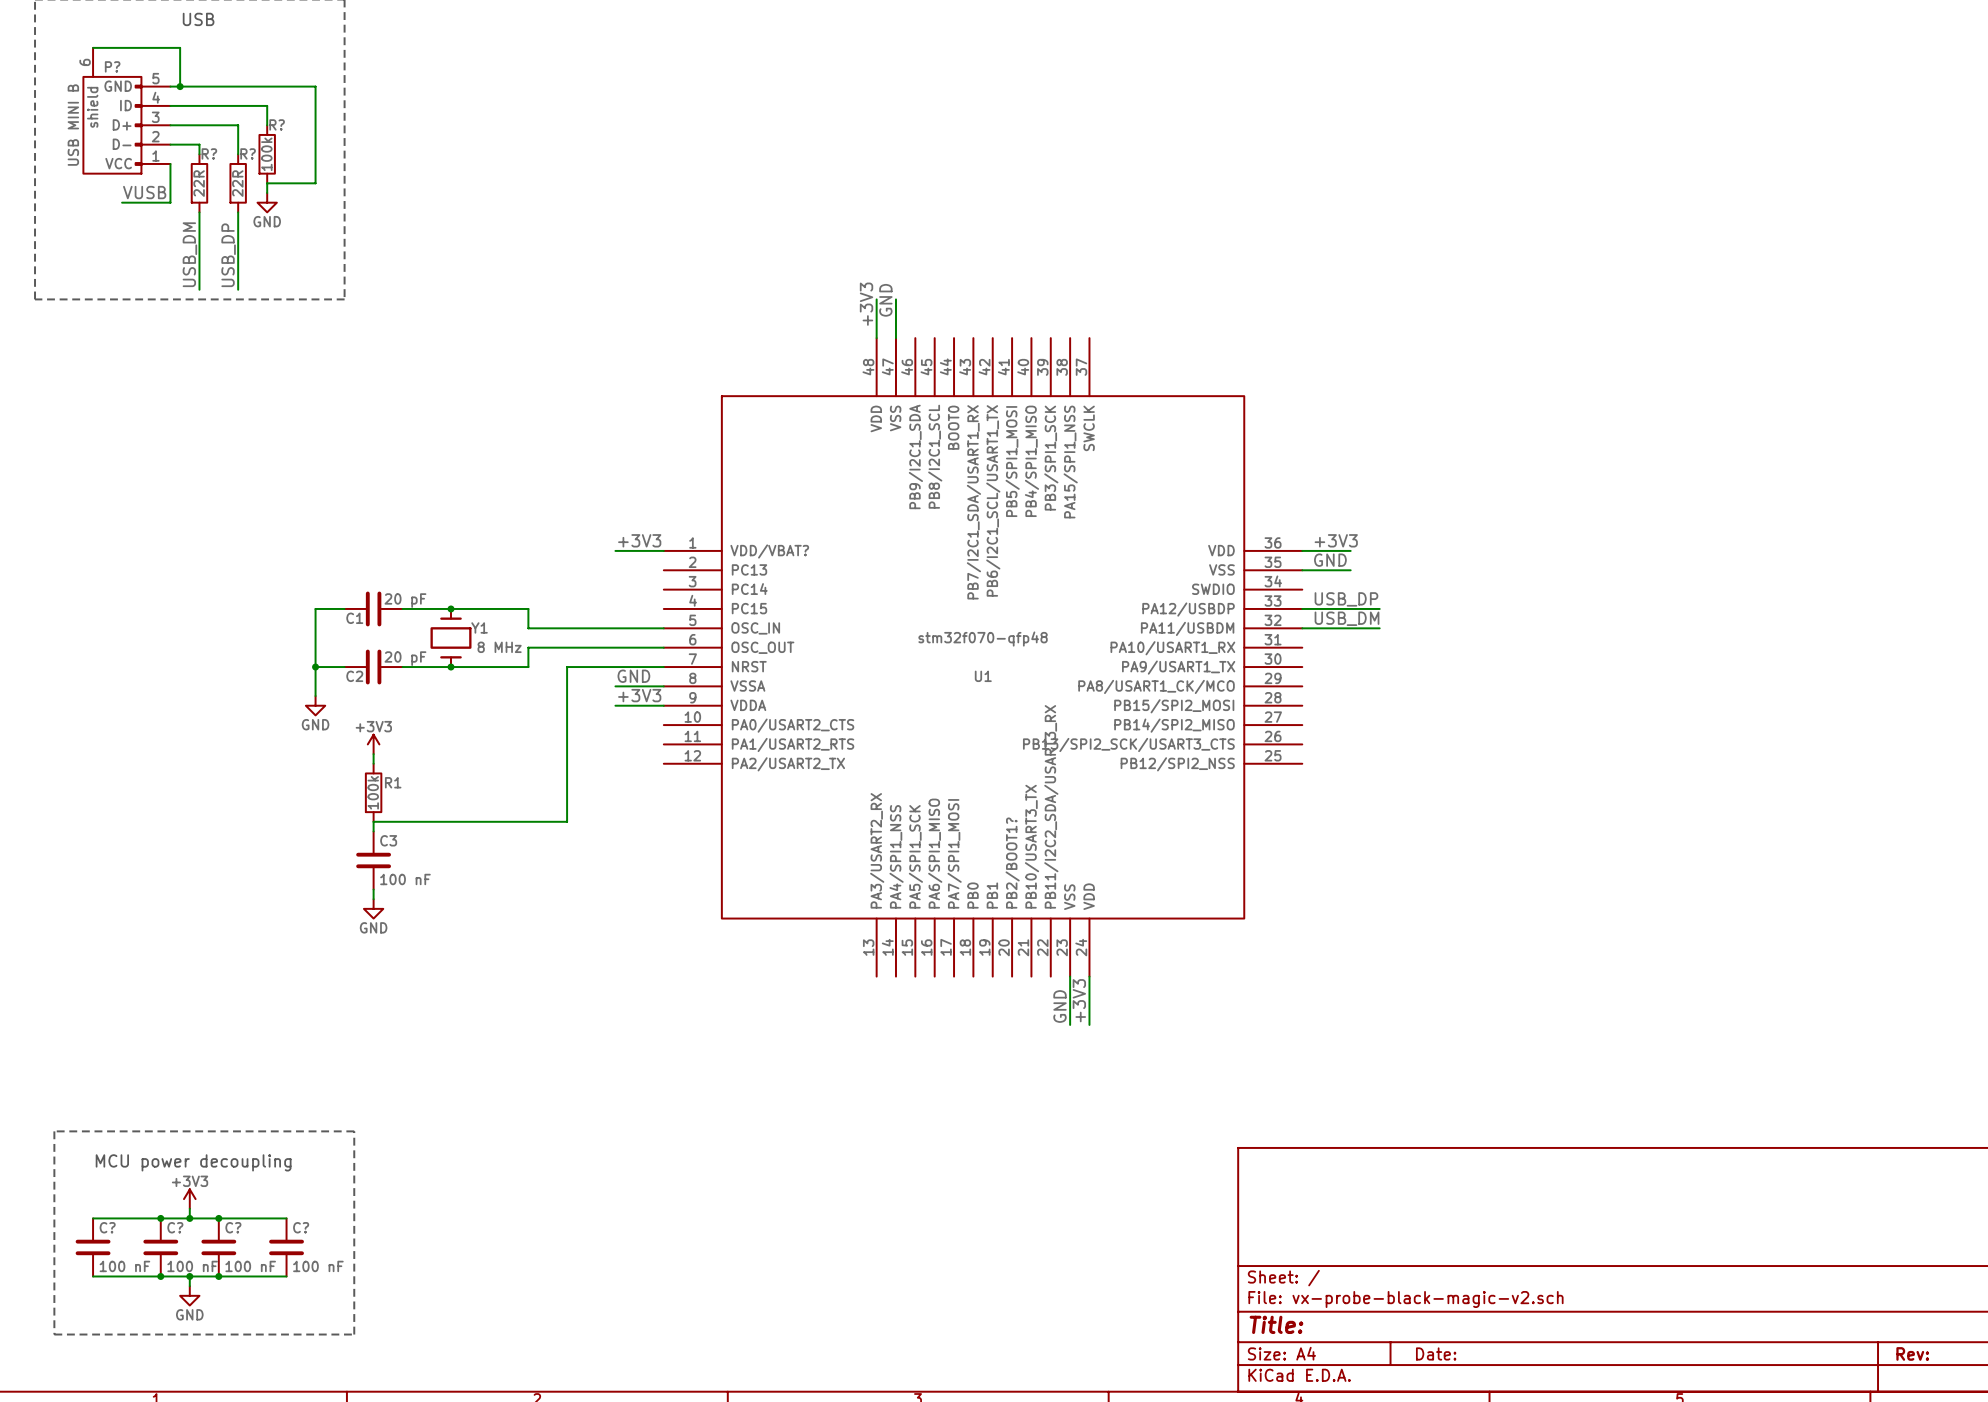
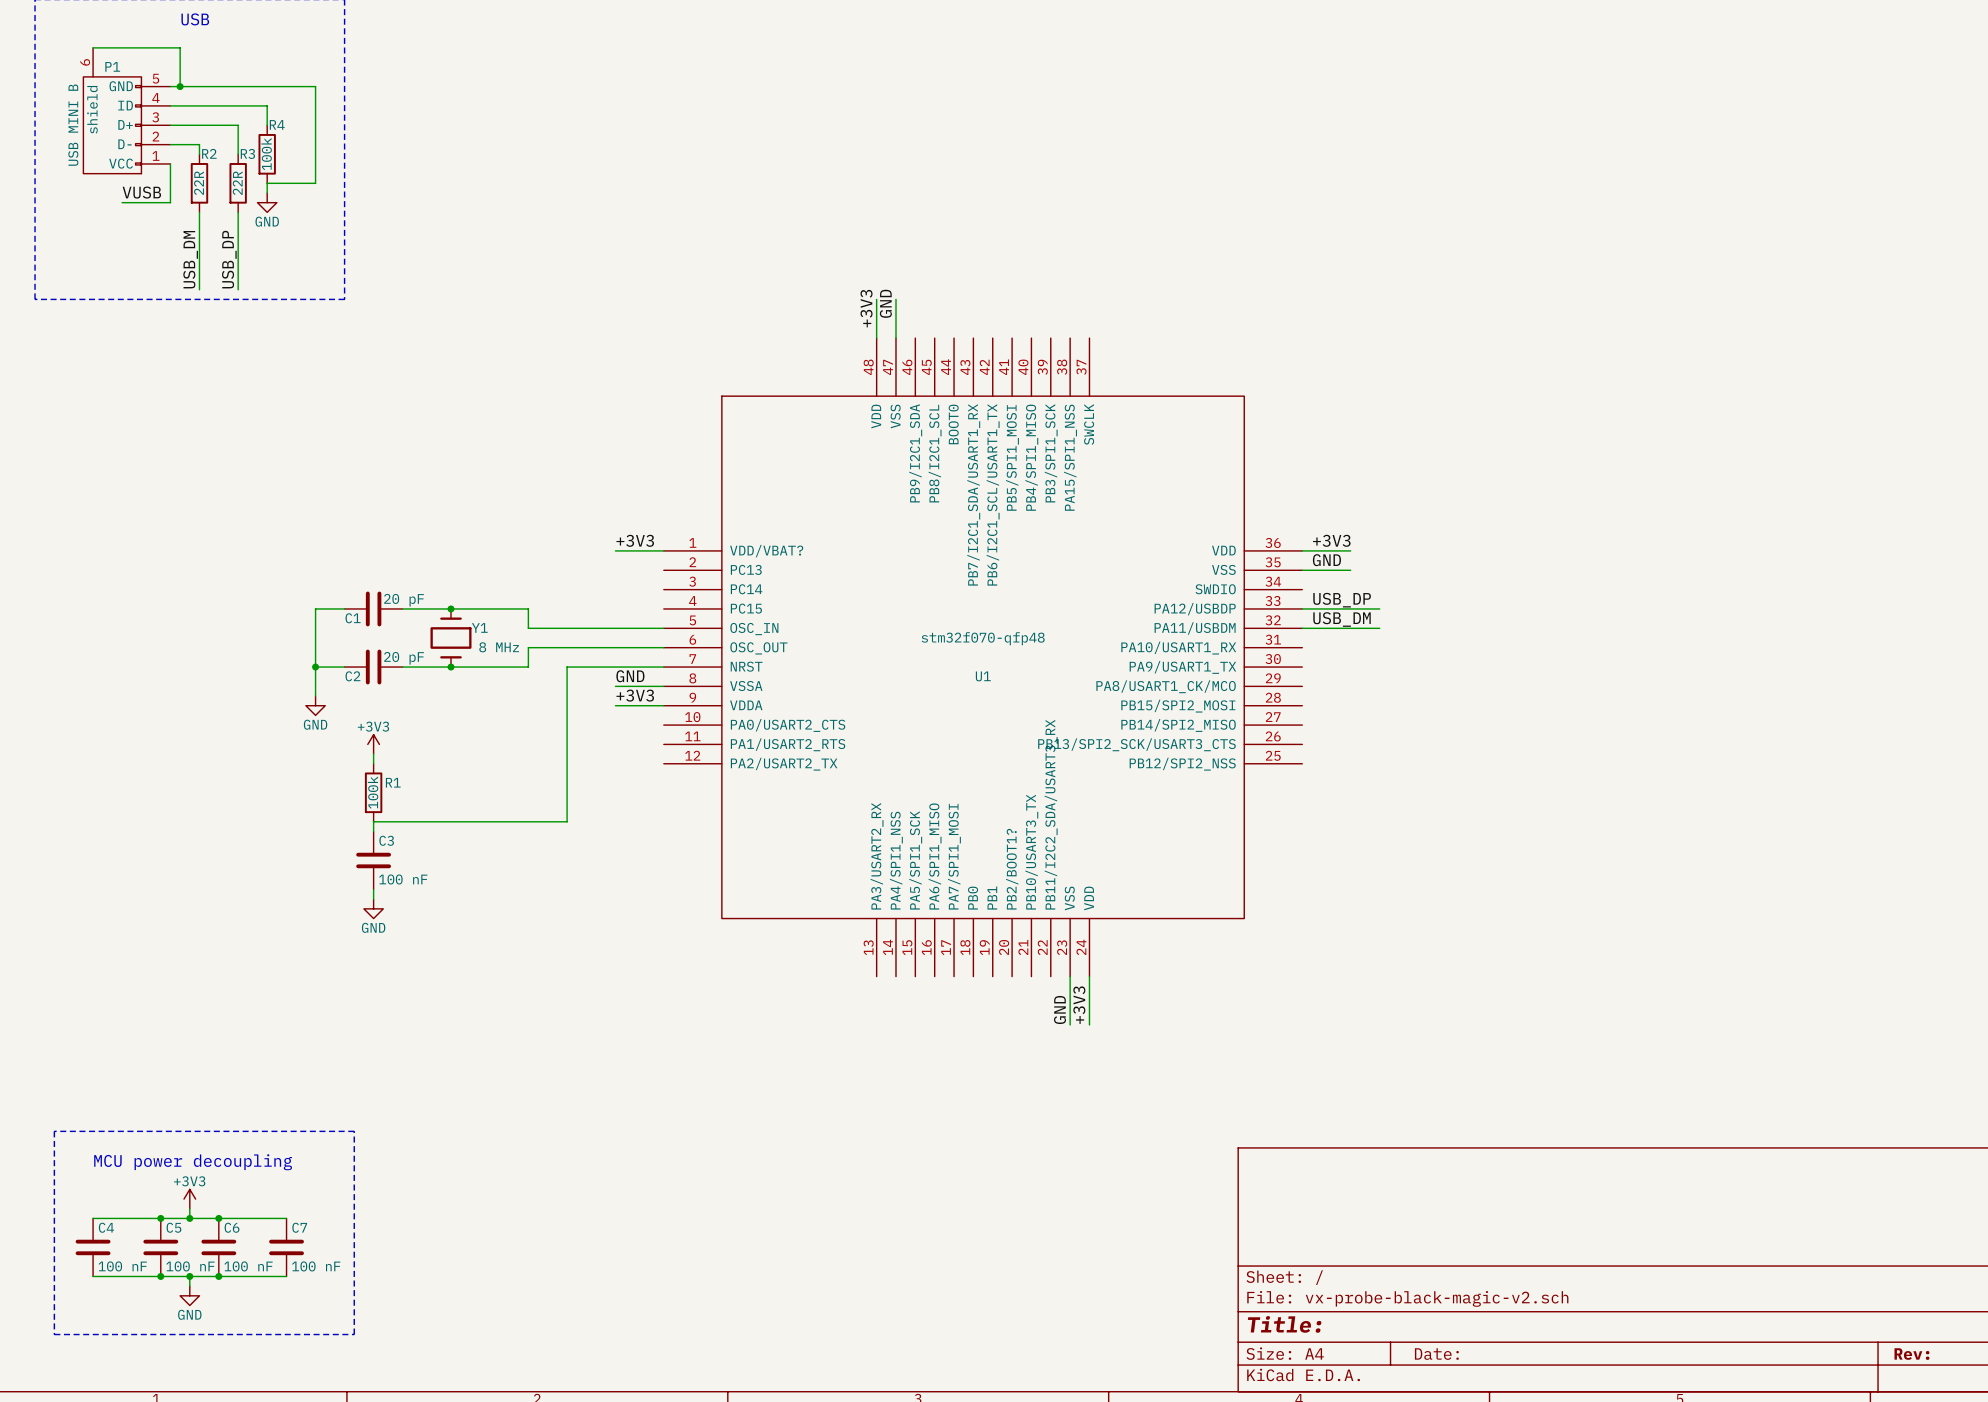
P? name: P? (112, 66) -> P1 (112, 66)
R? name: R? (277, 124) -> R4 (277, 124)
R? name: R? (209, 153) -> R2 (209, 153)
R? name: R? (248, 153) -> R3 (247, 153)
C? name: C? (107, 1227) -> C4 (106, 1227)
C? name: C? (175, 1227) -> C5 (173, 1227)
C? name: C? (233, 1227) -> C6 (232, 1227)
C? name: C? (301, 1227) -> C7 (299, 1227)

